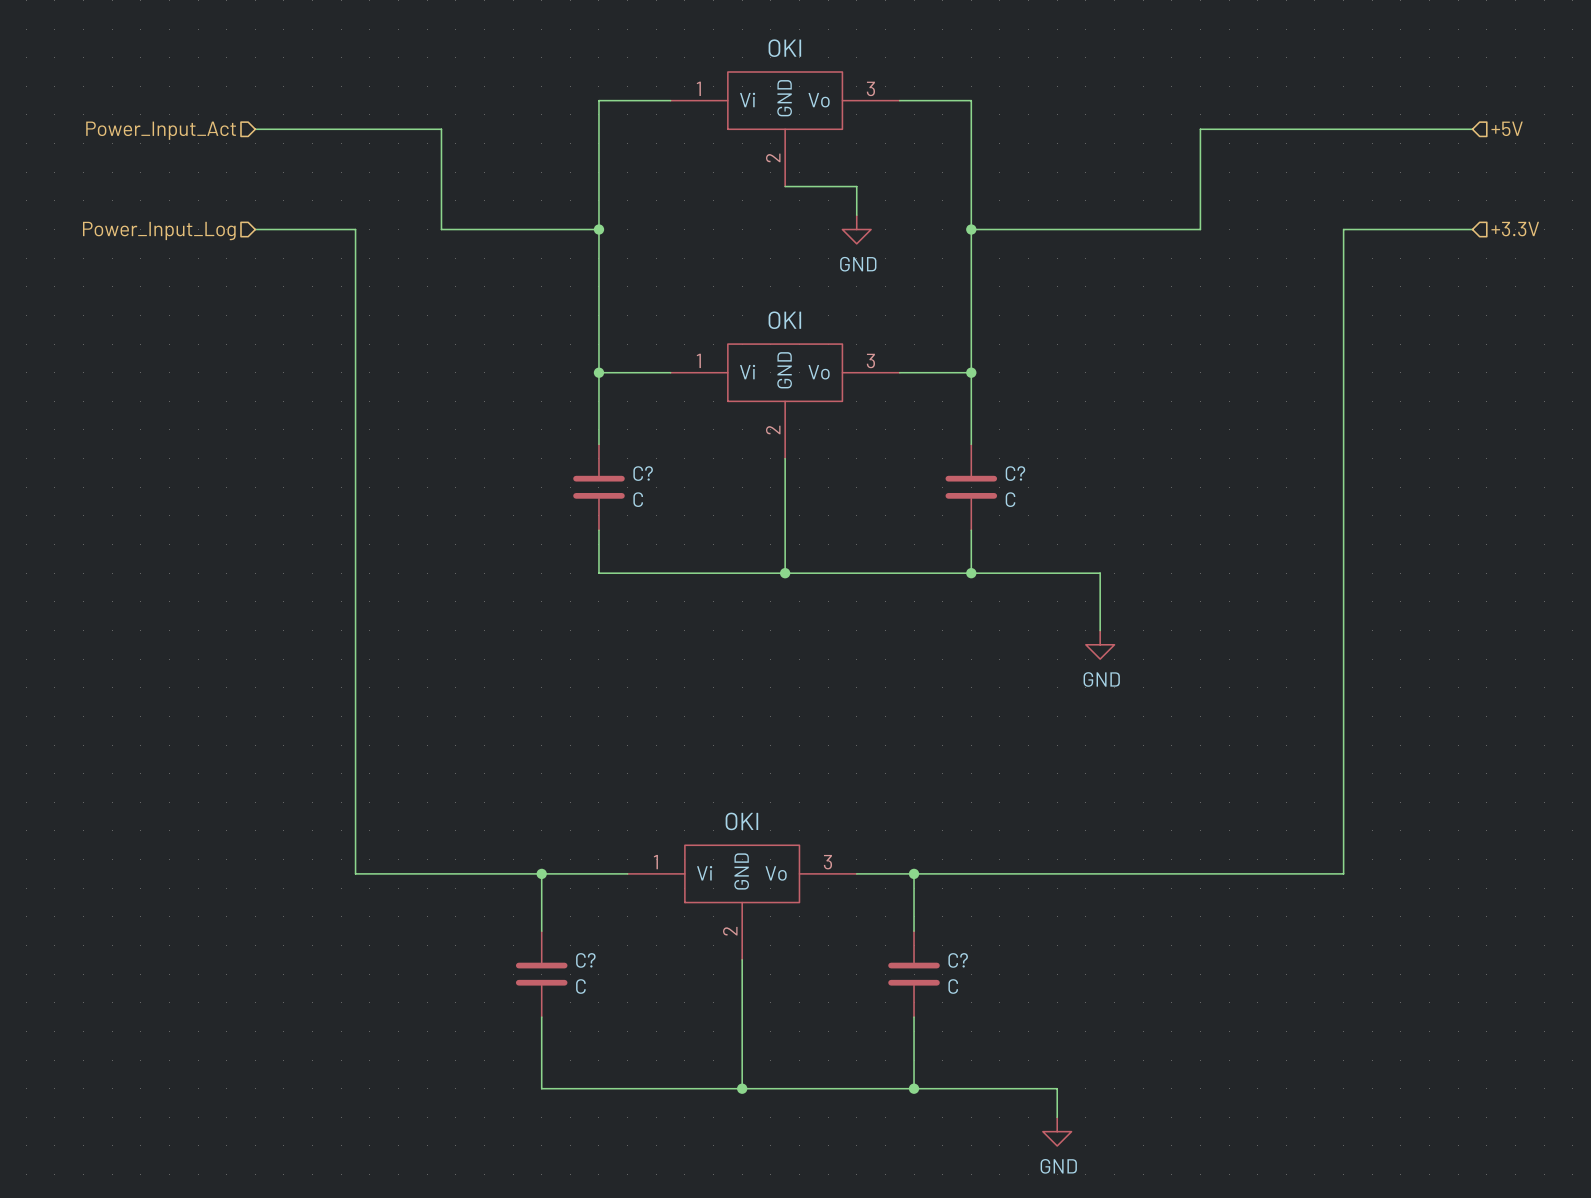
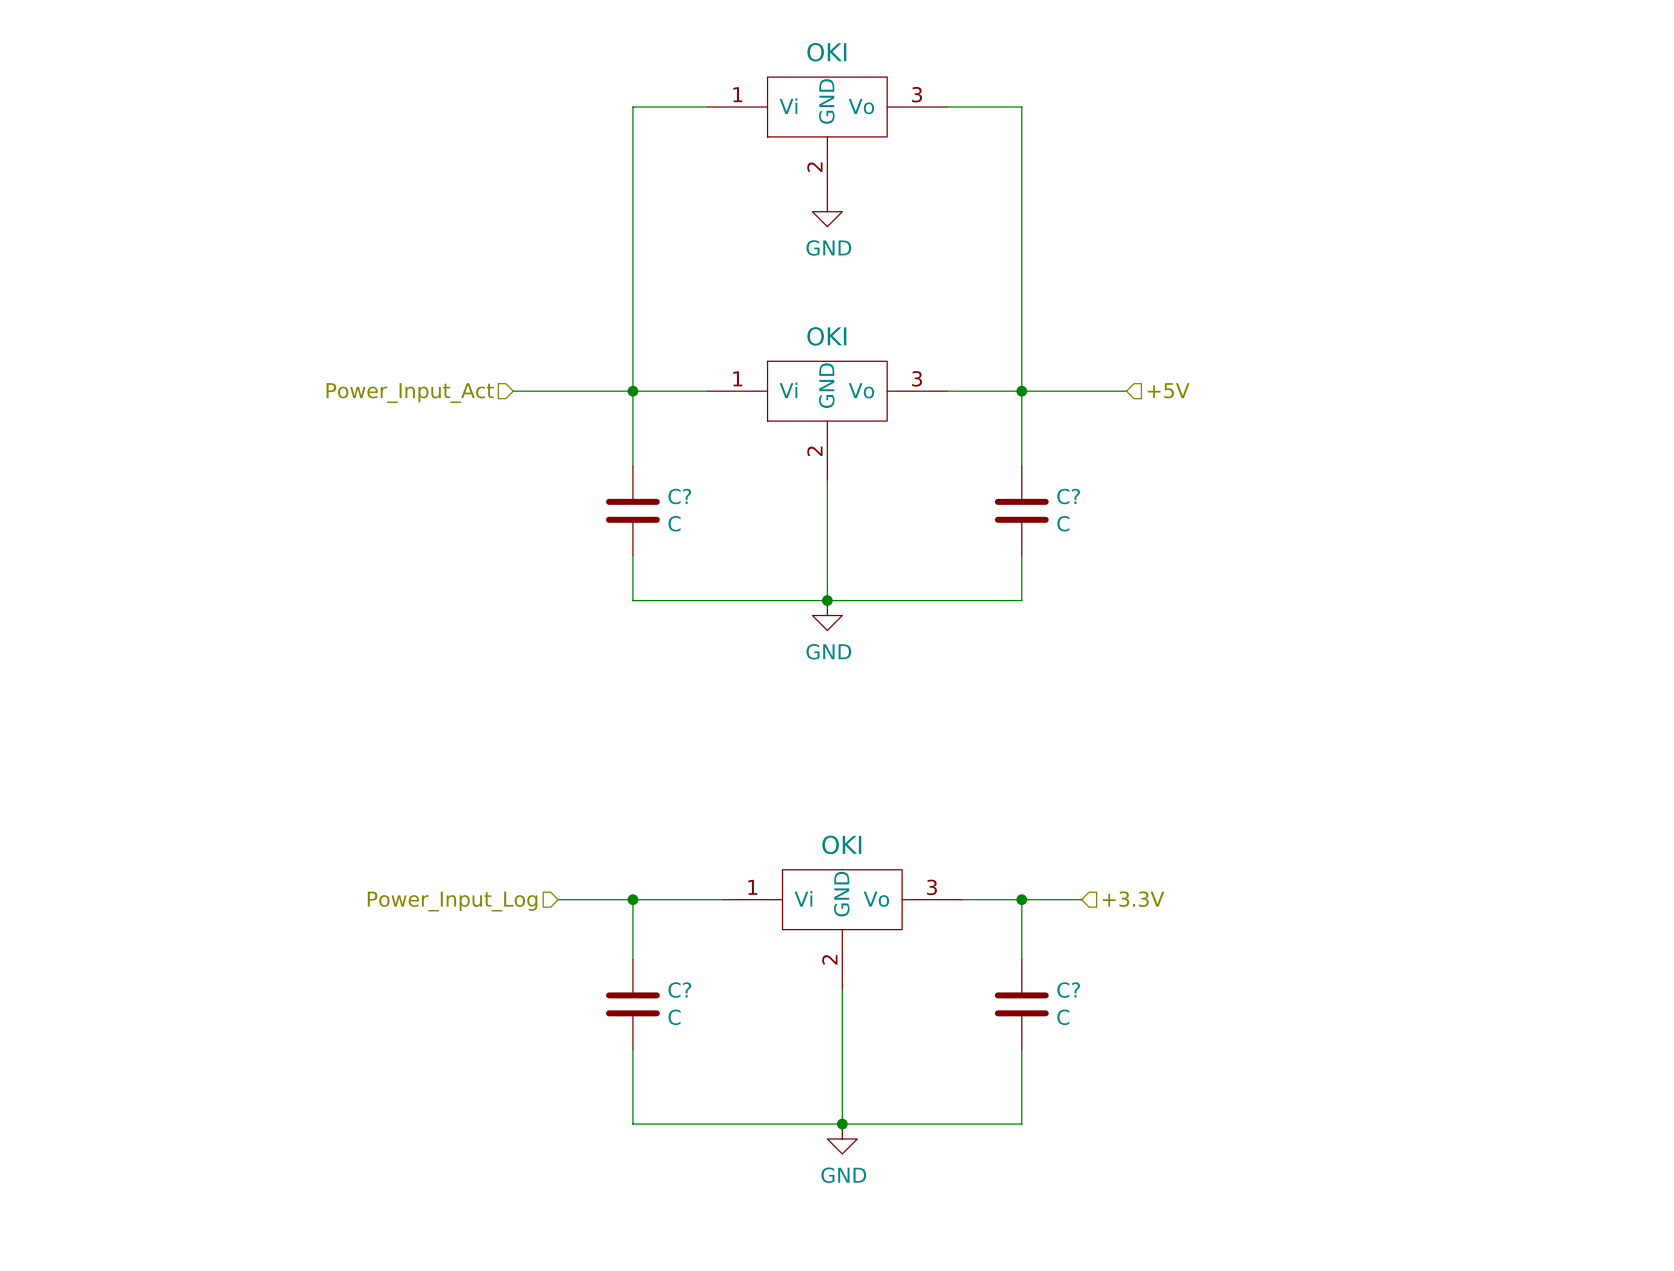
hierarchical label: +5V (1507, 128) -> none
wire: (255, 129) (441, 129) (441, 229) (598, 229) -> none
wire: (1472, 129) (1200, 129) (1200, 229) (971, 229) -> none
hierarchical label: Power_Input_Act (161, 130) -> none
wire: (785, 186) (856, 186) (856, 215) -> none
wire: (255, 229) (355, 229) (355, 873) (627, 873) -> none
junction: (598, 229) -> none
power symbol position: GND (856, 229) -> GND (827, 211)
junction: (971, 229) -> none
wire: (1472, 229) (1343, 229) (1343, 873) (856, 873) -> none
hierarchical label: +3.3V (1515, 229) -> none
hierarchical label: Power_Input_Log (159, 231) -> none
wire: none -> (513, 391) (632, 391)
wire: none -> (1021, 391) (1126, 391)
hierarchical label: none -> +5V (1168, 390)
hierarchical label: none -> Power_Input_Act (410, 393)
wire: (971, 573) (1100, 573) (1100, 630) -> none
junction: (971, 573) -> none
power symbol: none -> GND (827, 615)
power symbol: GND (1100, 644) -> none
wire: none -> (558, 899) (722, 899)
wire: none -> (961, 899) (1081, 899)
hierarchical label: none -> +3.3V (1133, 899)
hierarchical label: none -> Power_Input_Log (452, 901)
wire: (541, 873) (541, 931) -> (632, 899) (632, 959)
junction position: (541, 873) -> (632, 899)
wire: (914, 873) (914, 931) -> (1021, 899) (1021, 959)
junction position: (914, 873) -> (1021, 899)
part position: (742, 902) -> (842, 929)
wire: (742, 959) (742, 1088) -> (842, 989) (842, 1124)
C? position: (541, 974) -> (632, 1004)
C? position: (914, 974) -> (1021, 1004)
wire: none -> (632, 1049) (632, 1124) (1021, 1124) (1021, 1049)
wire: (541, 1017) (541, 1088) (1057, 1088) (1057, 1117) -> none
wire: (914, 1017) (914, 1088) -> none
junction: none -> (842, 1124)
junction: (742, 1088) -> none
junction: (914, 1088) -> none
power symbol position: GND (1057, 1131) -> GND (842, 1138)

